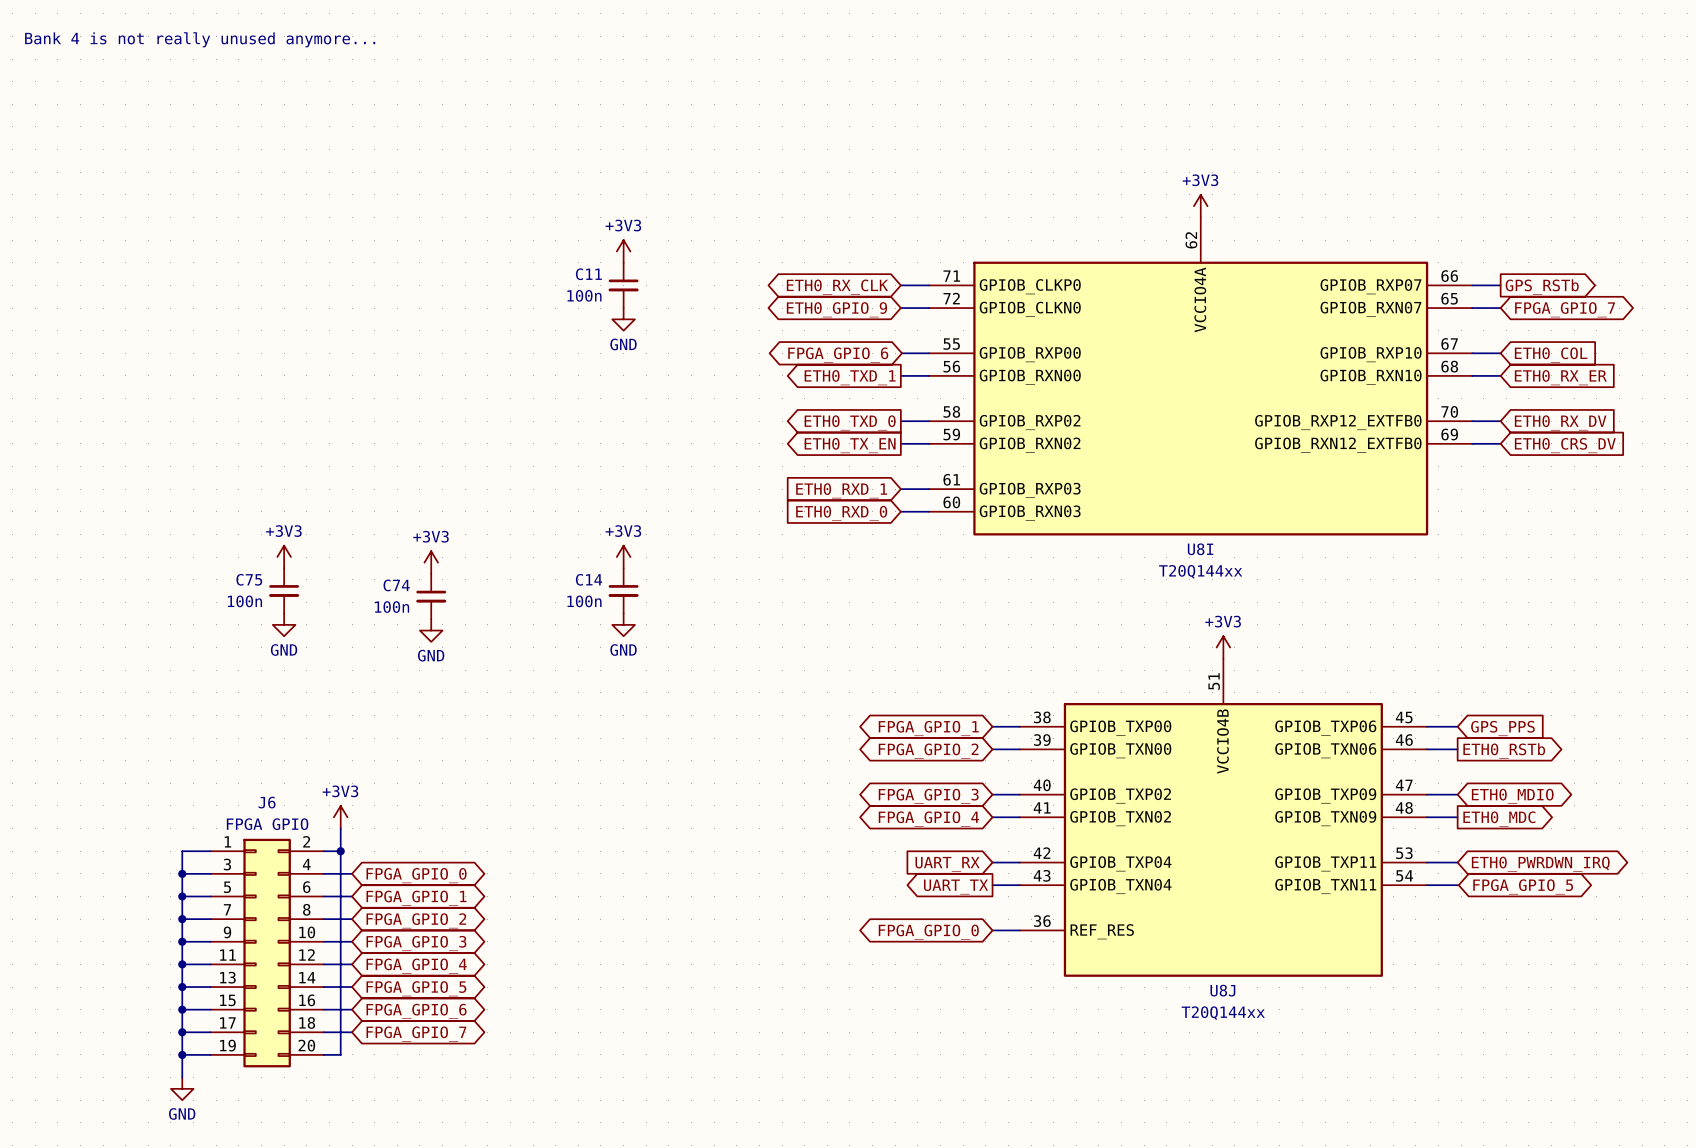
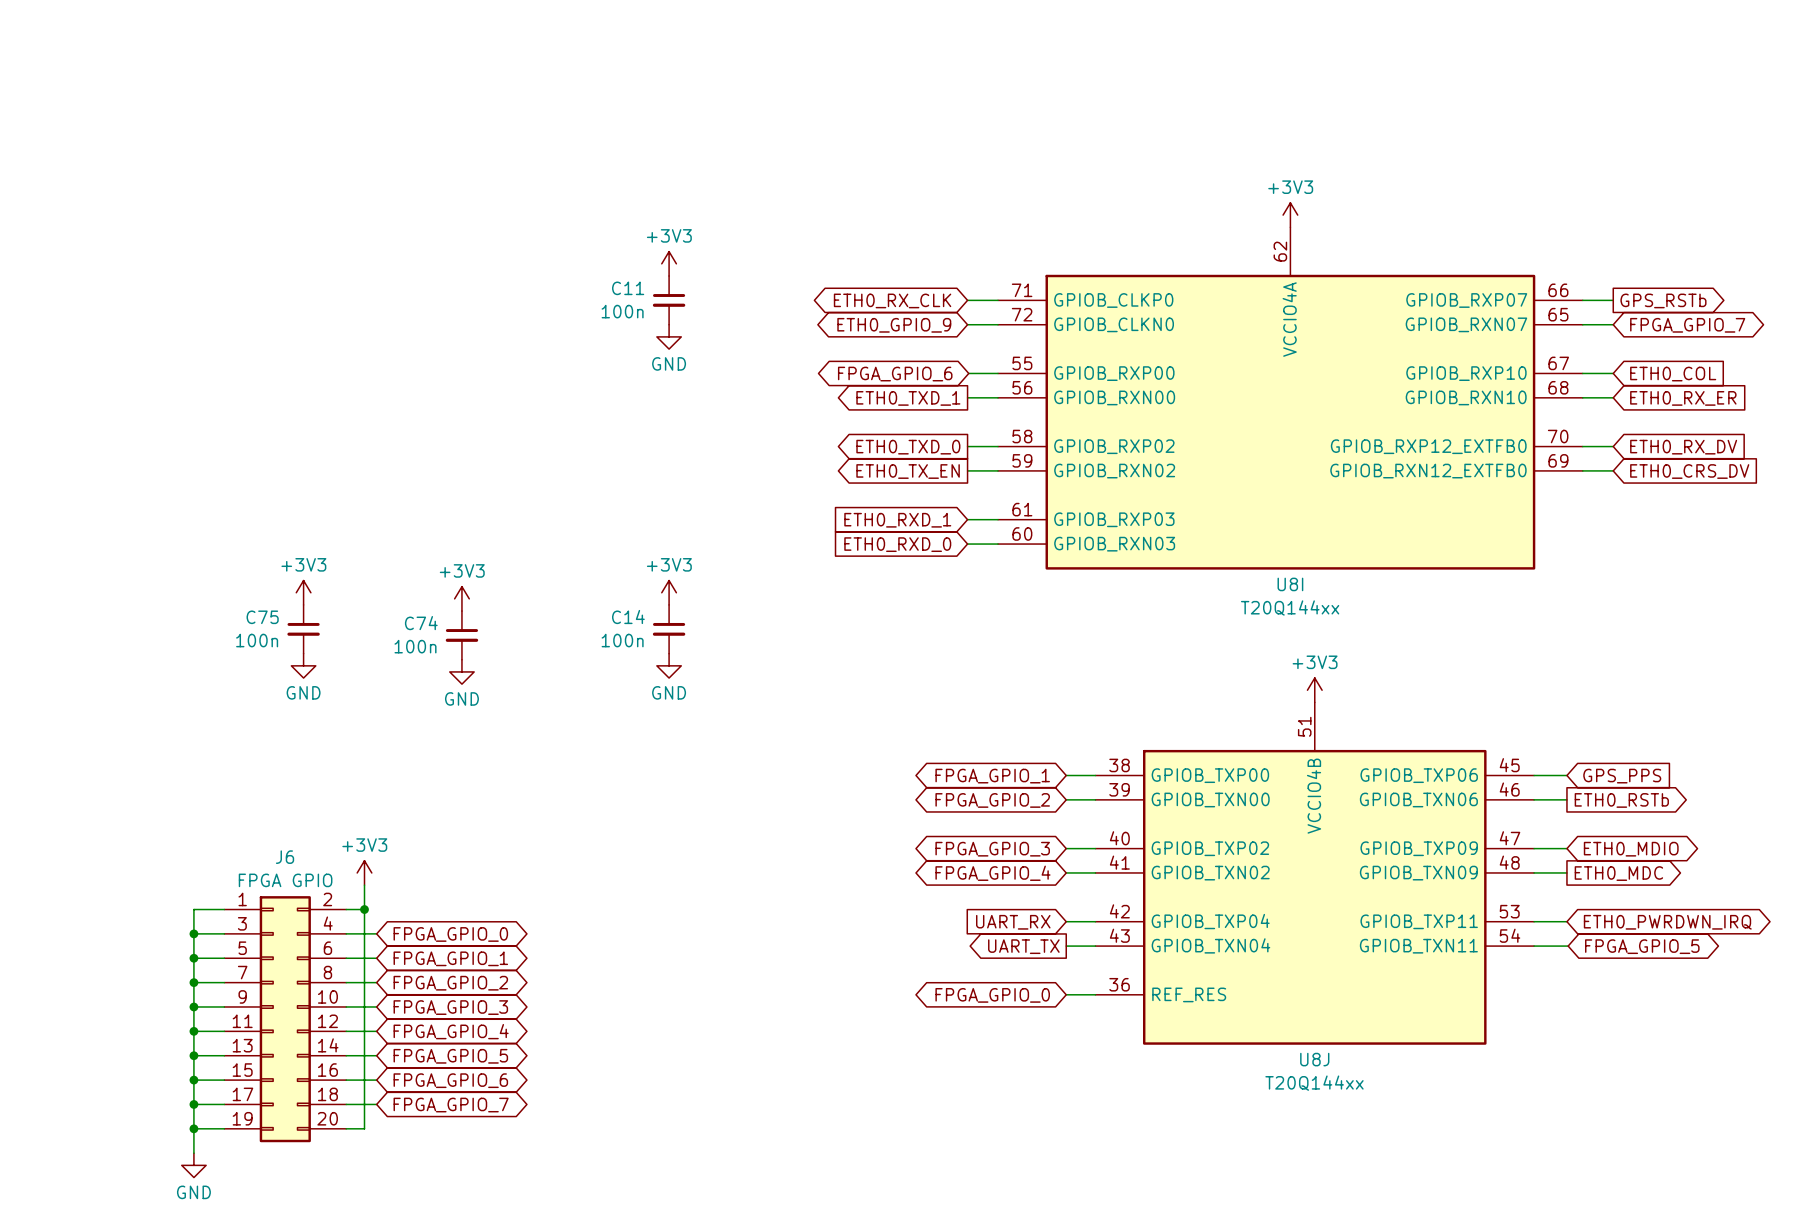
text: Bank 4 is not really unused anymore... (200, 39) -> none

